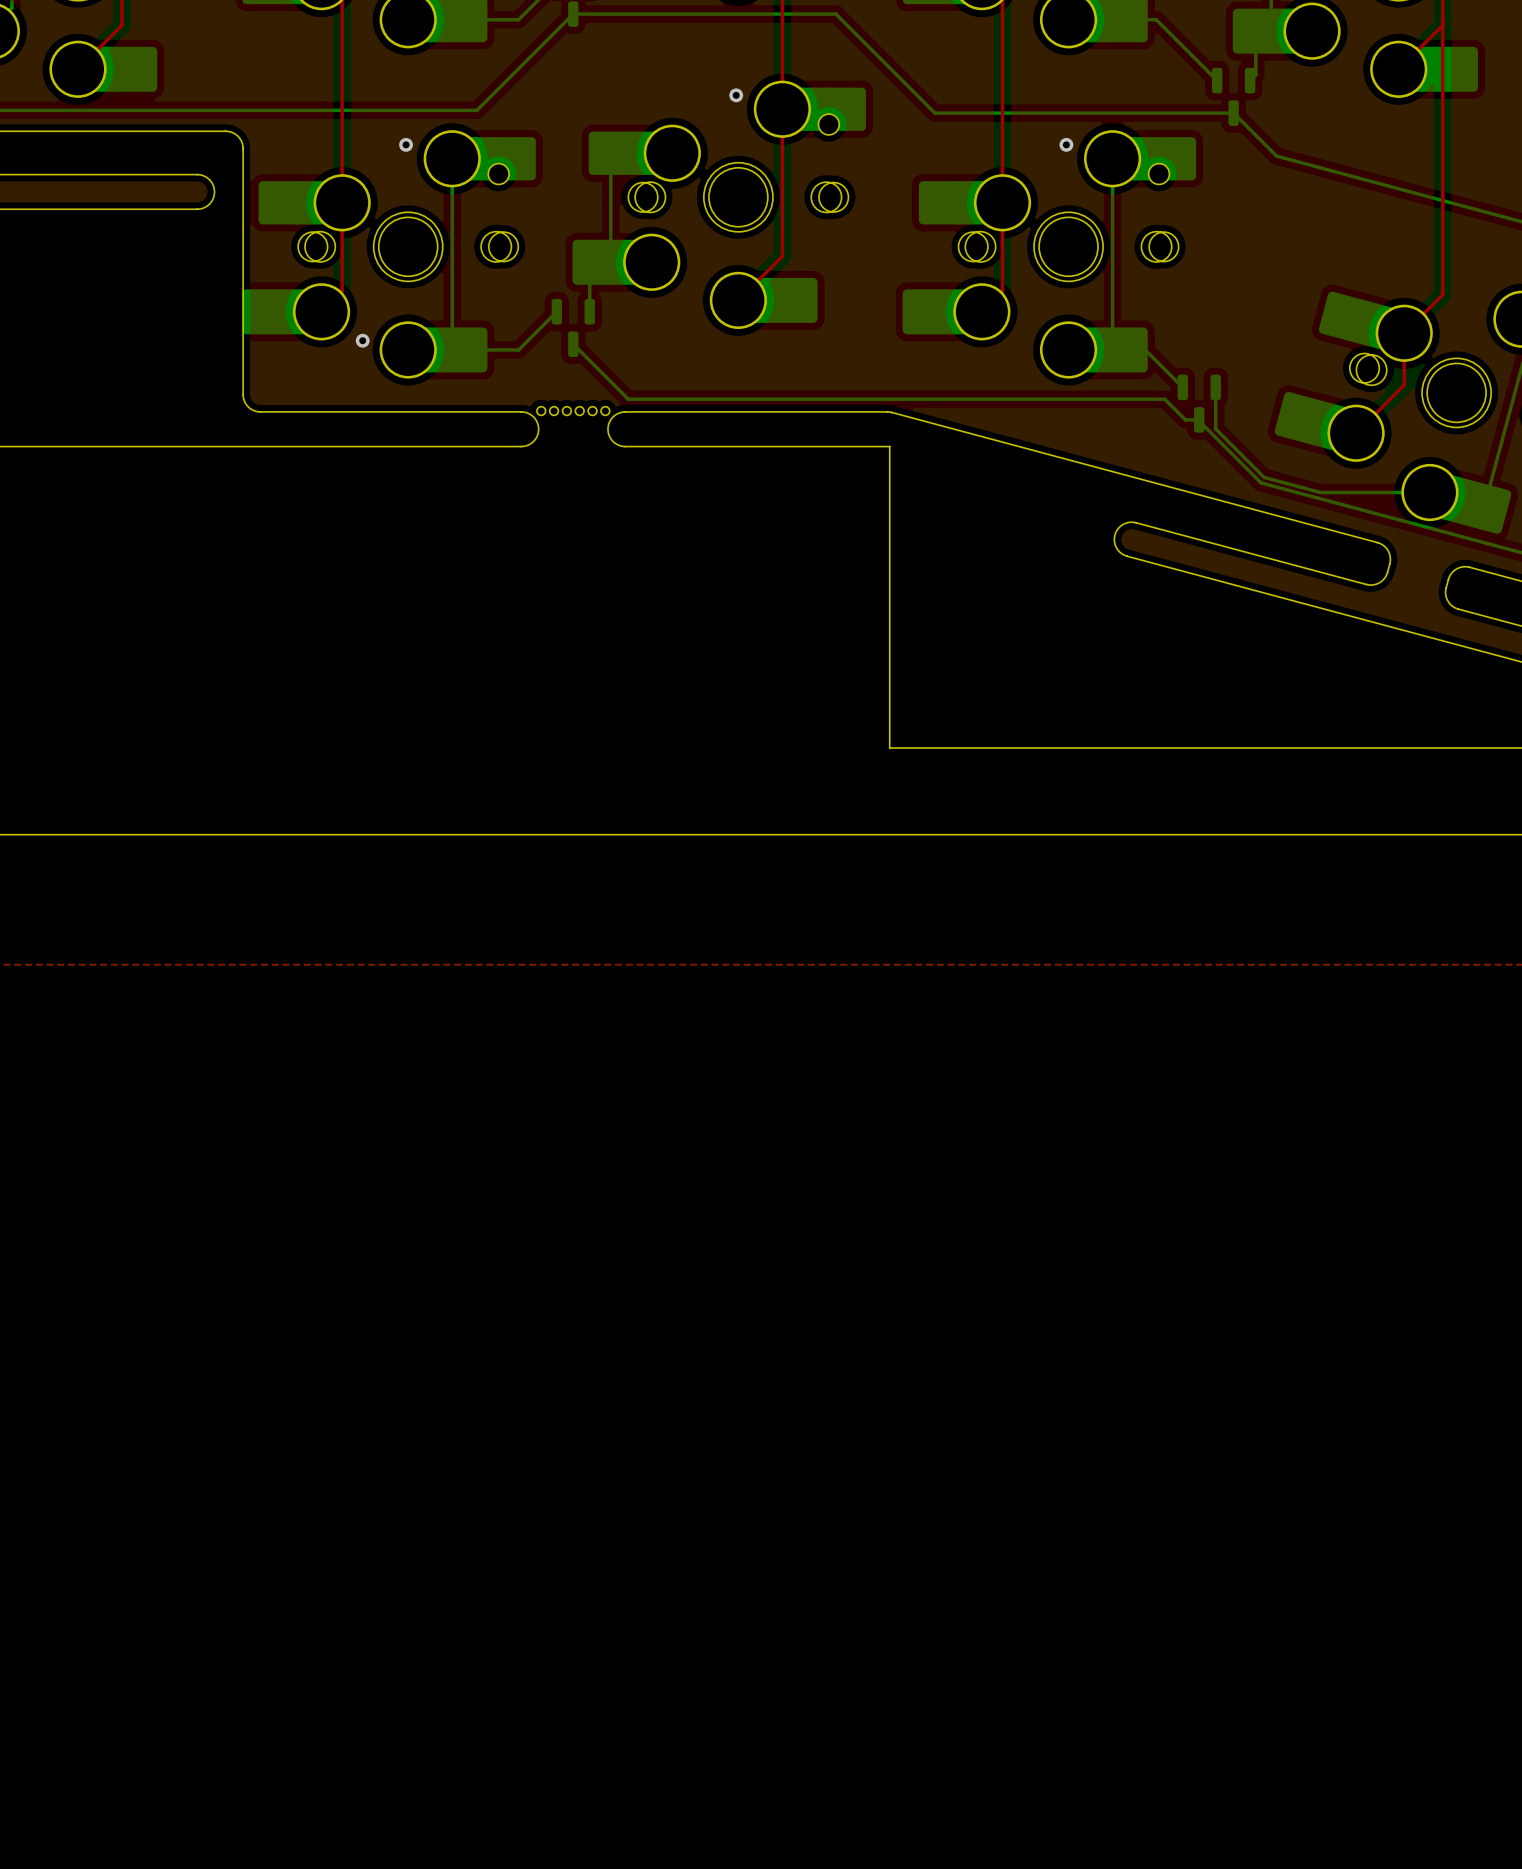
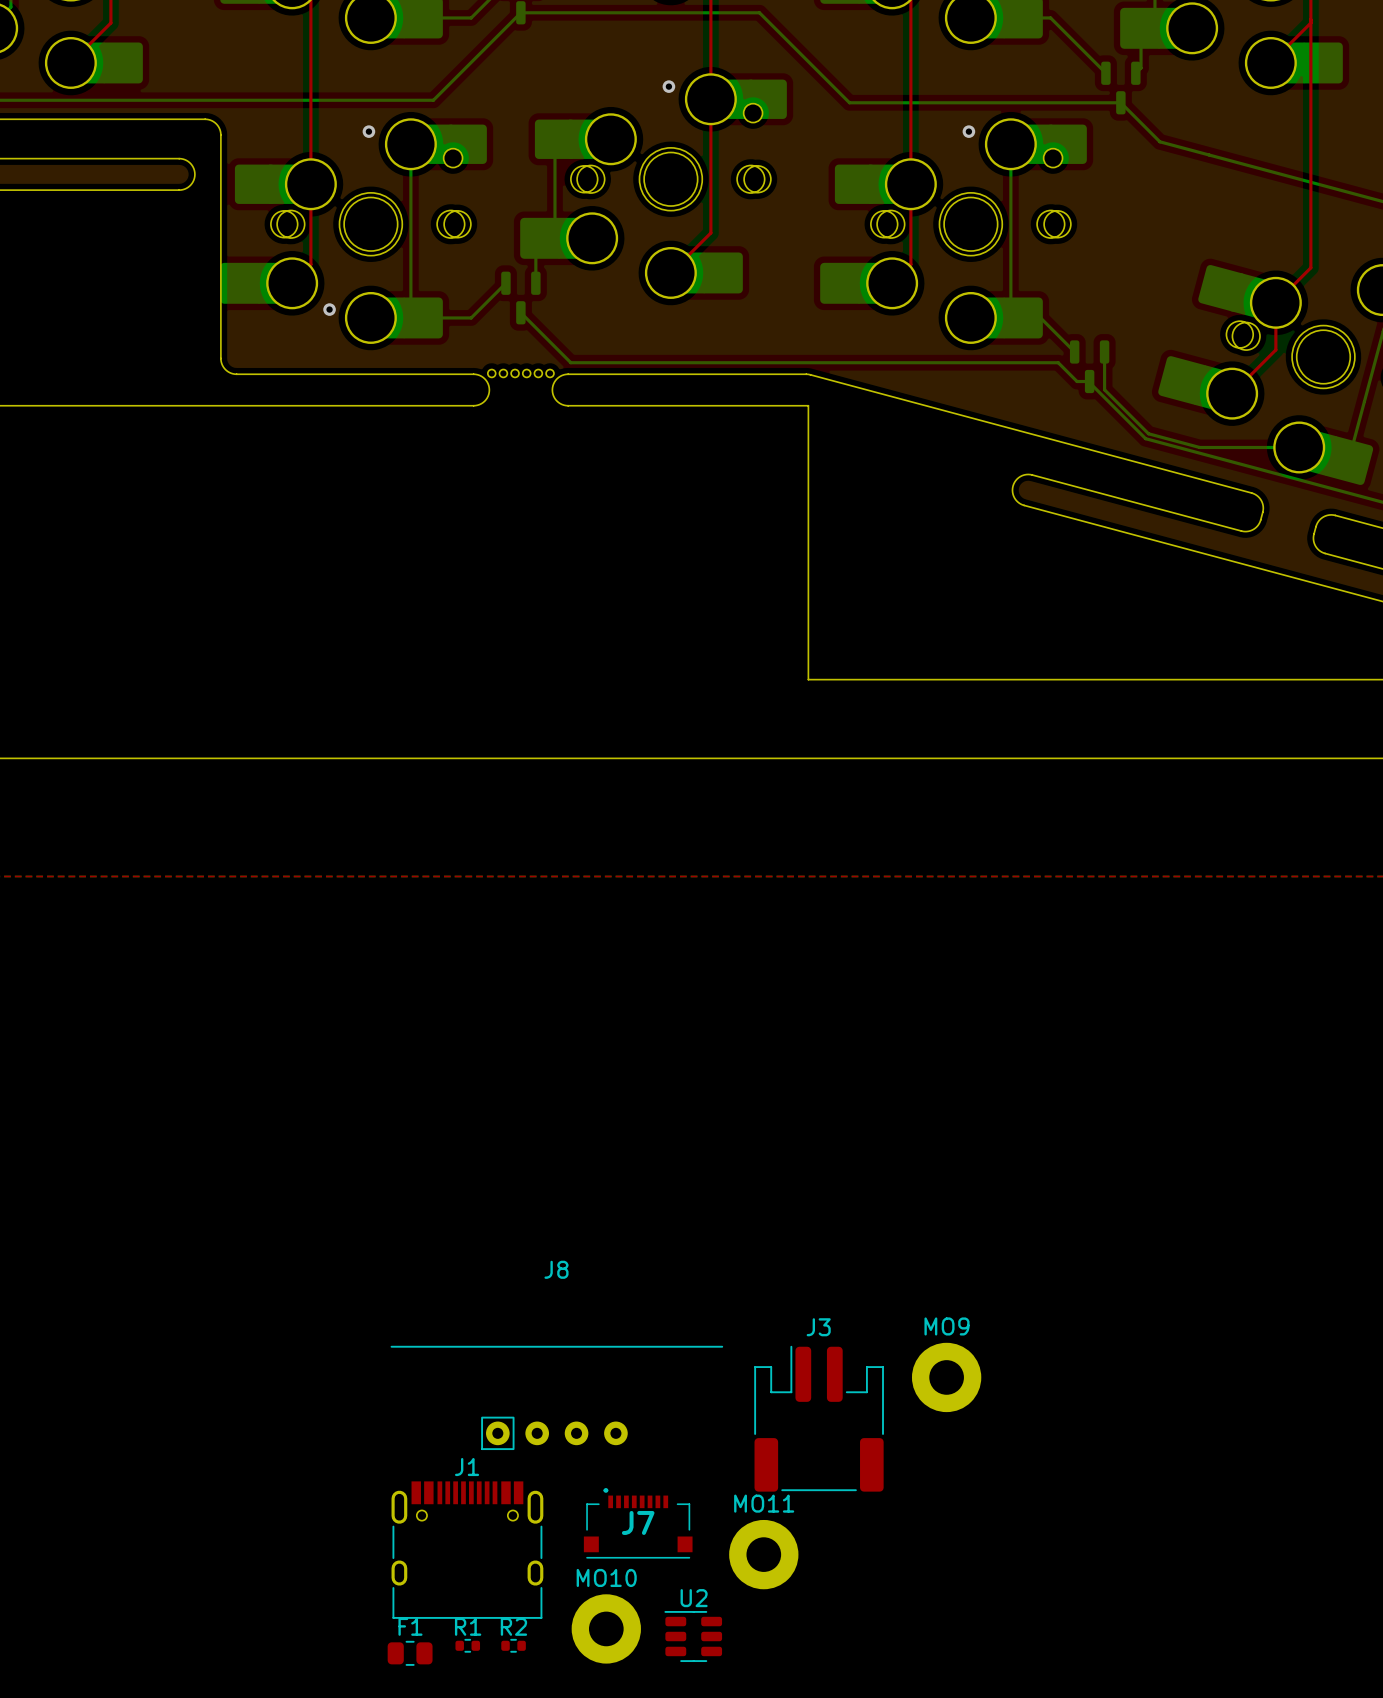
MO9: none -> (946, 1377)
J8: none -> (556, 1397)
J3: none -> (819, 1418)
J7: none -> (638, 1523)
J1: none -> (467, 1550)
MO11: none -> (763, 1554)
MO10: none -> (606, 1628)
U2: none -> (693, 1636)
R1: none -> (467, 1645)
R2: none -> (513, 1645)
F1: none -> (410, 1653)

